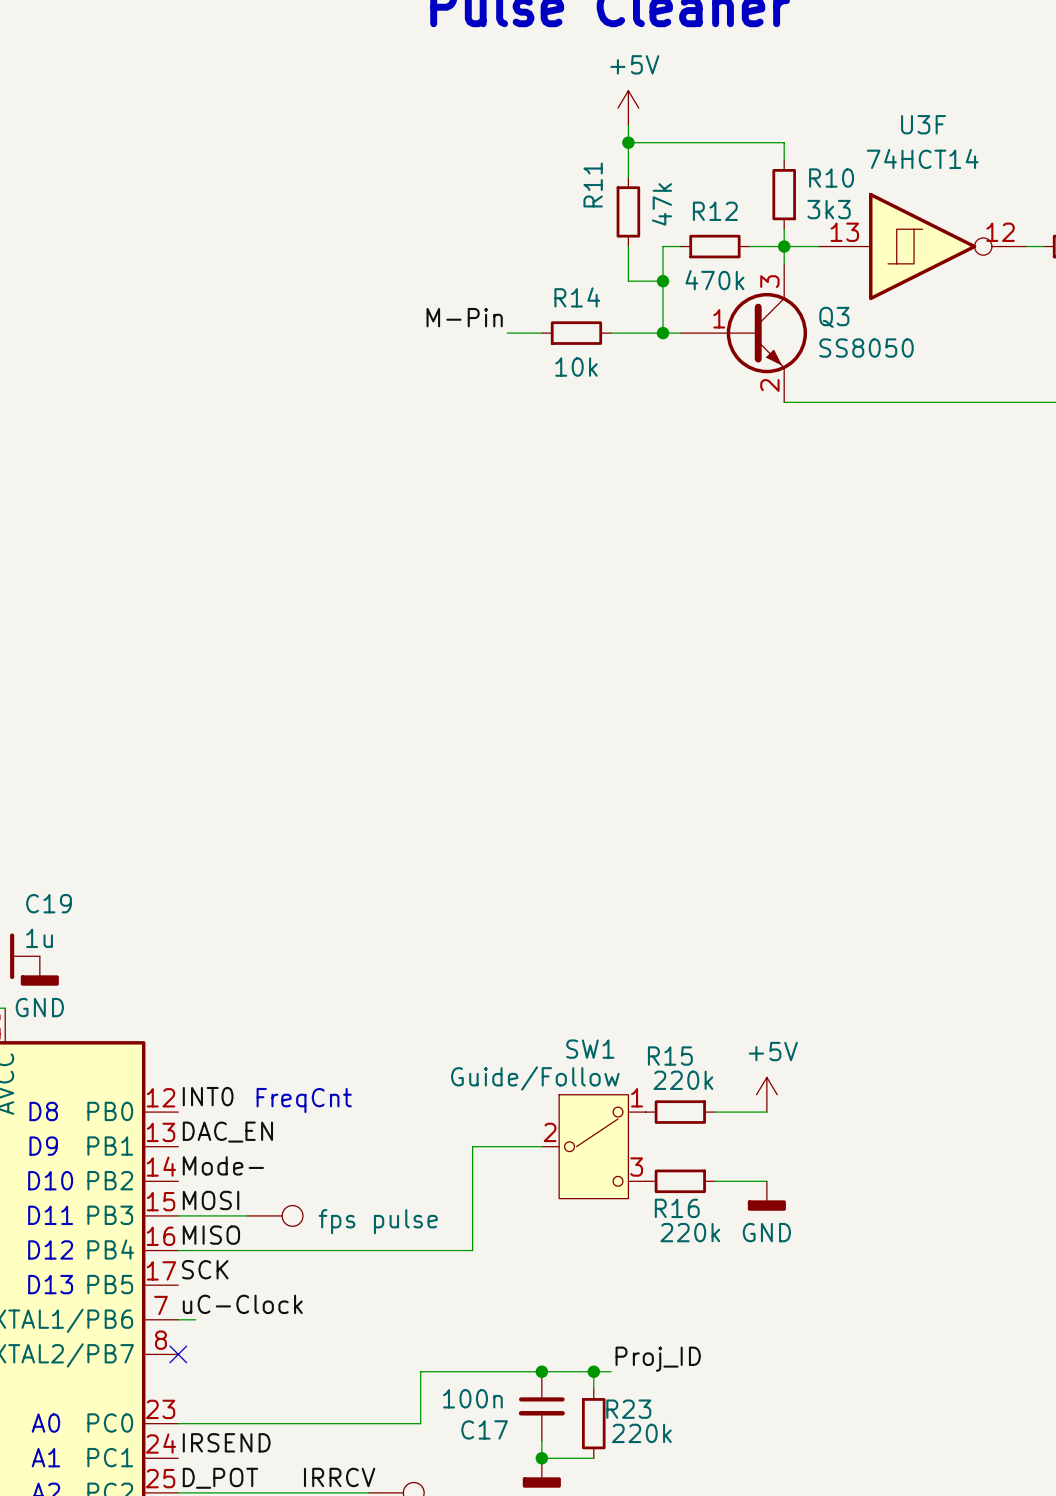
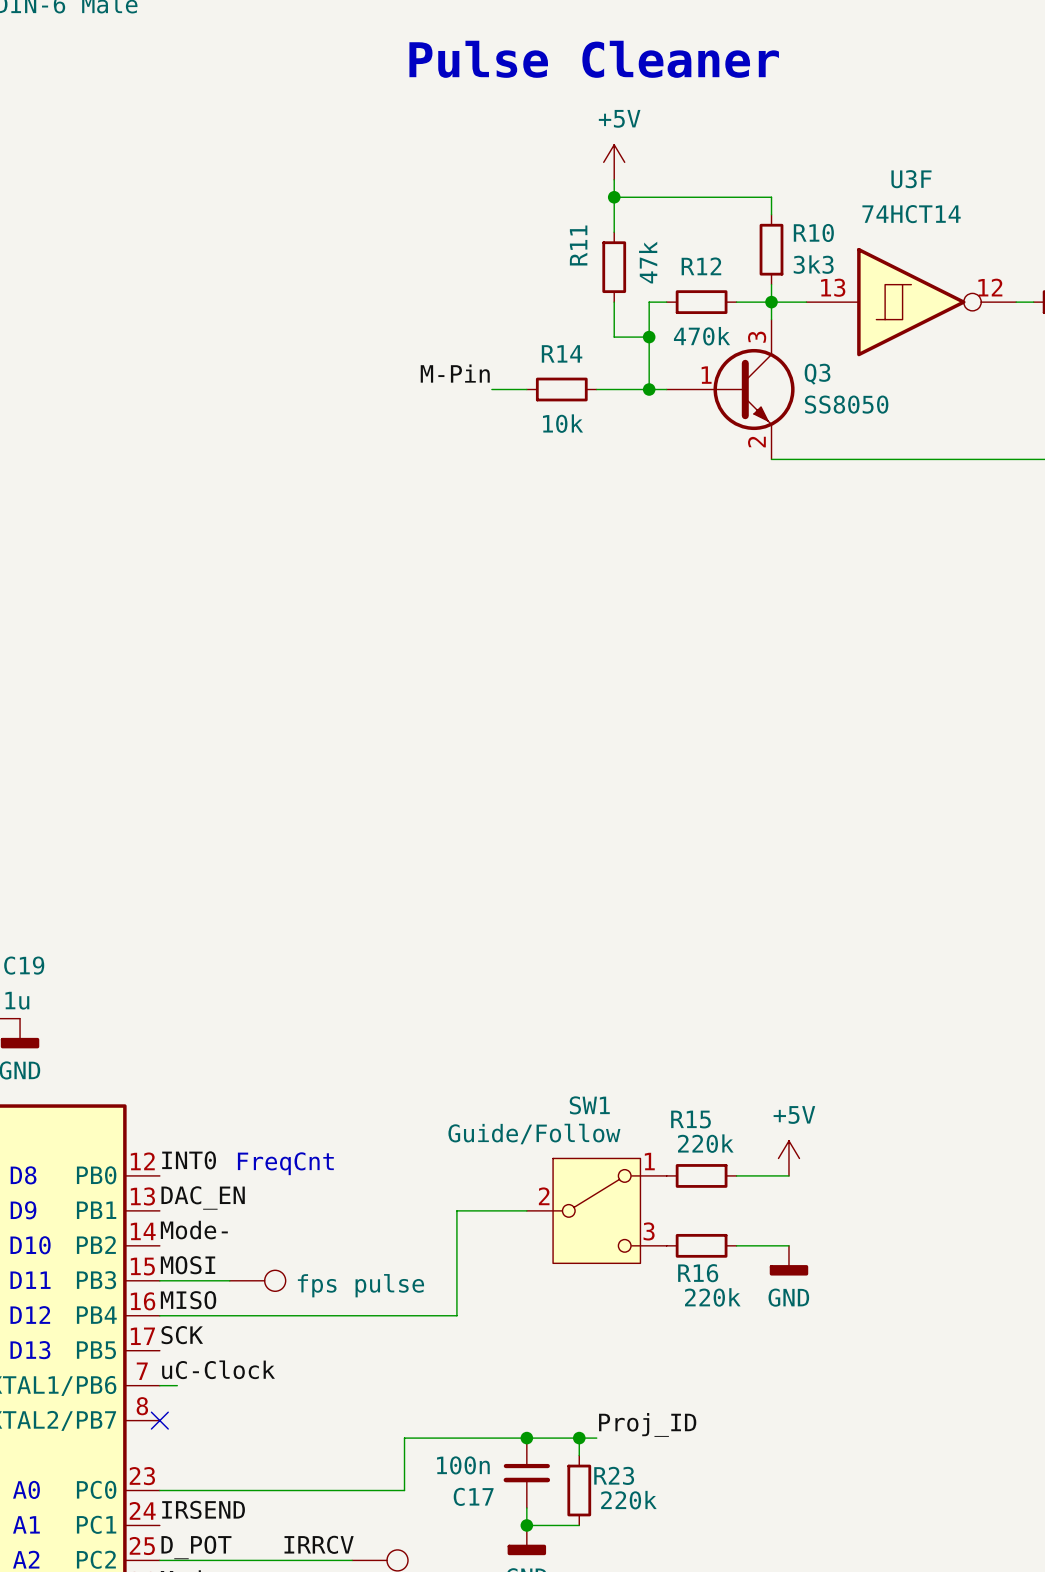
SW1 symbol: [541, 1094, 646, 1199] -> [526, 1158, 667, 1264]
power symbol position: +5V (766, 1094) -> +5V (788, 1158)
R15 position: (680, 1112) -> (701, 1175)
wire: (714, 1112) (749, 1112) -> (754, 1175) (788, 1175)
R16 position: (680, 1181) -> (701, 1245)
wire: (714, 1181) (749, 1181) -> (754, 1245) (788, 1245)
power symbol position: GND (766, 1196) -> GND (788, 1260)

